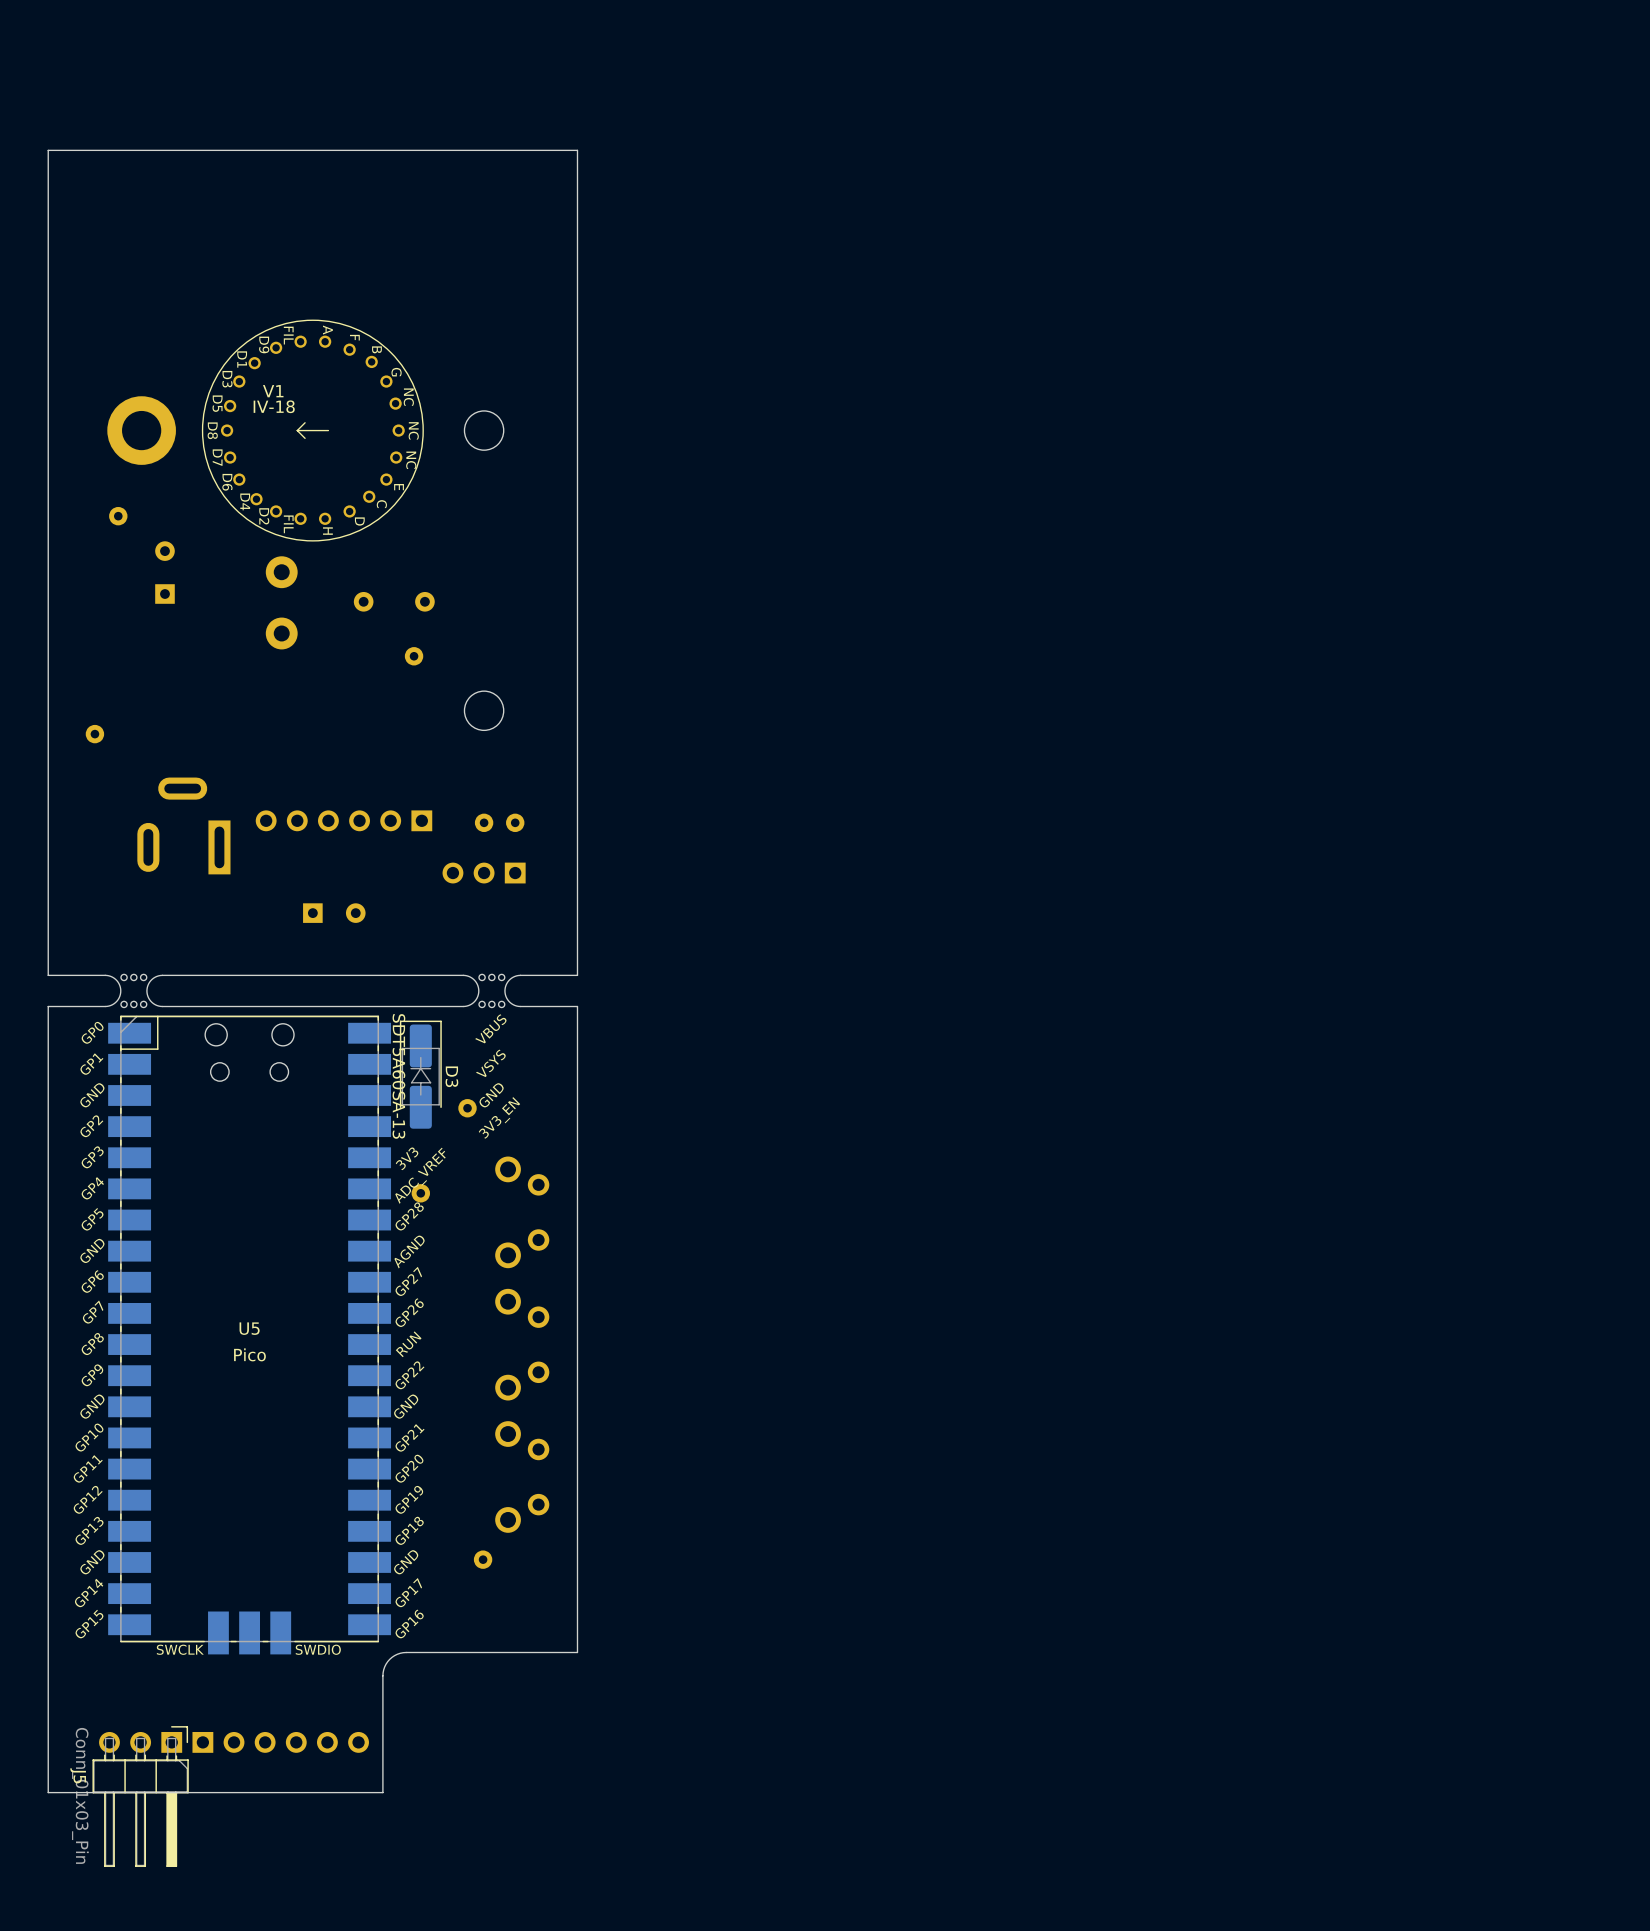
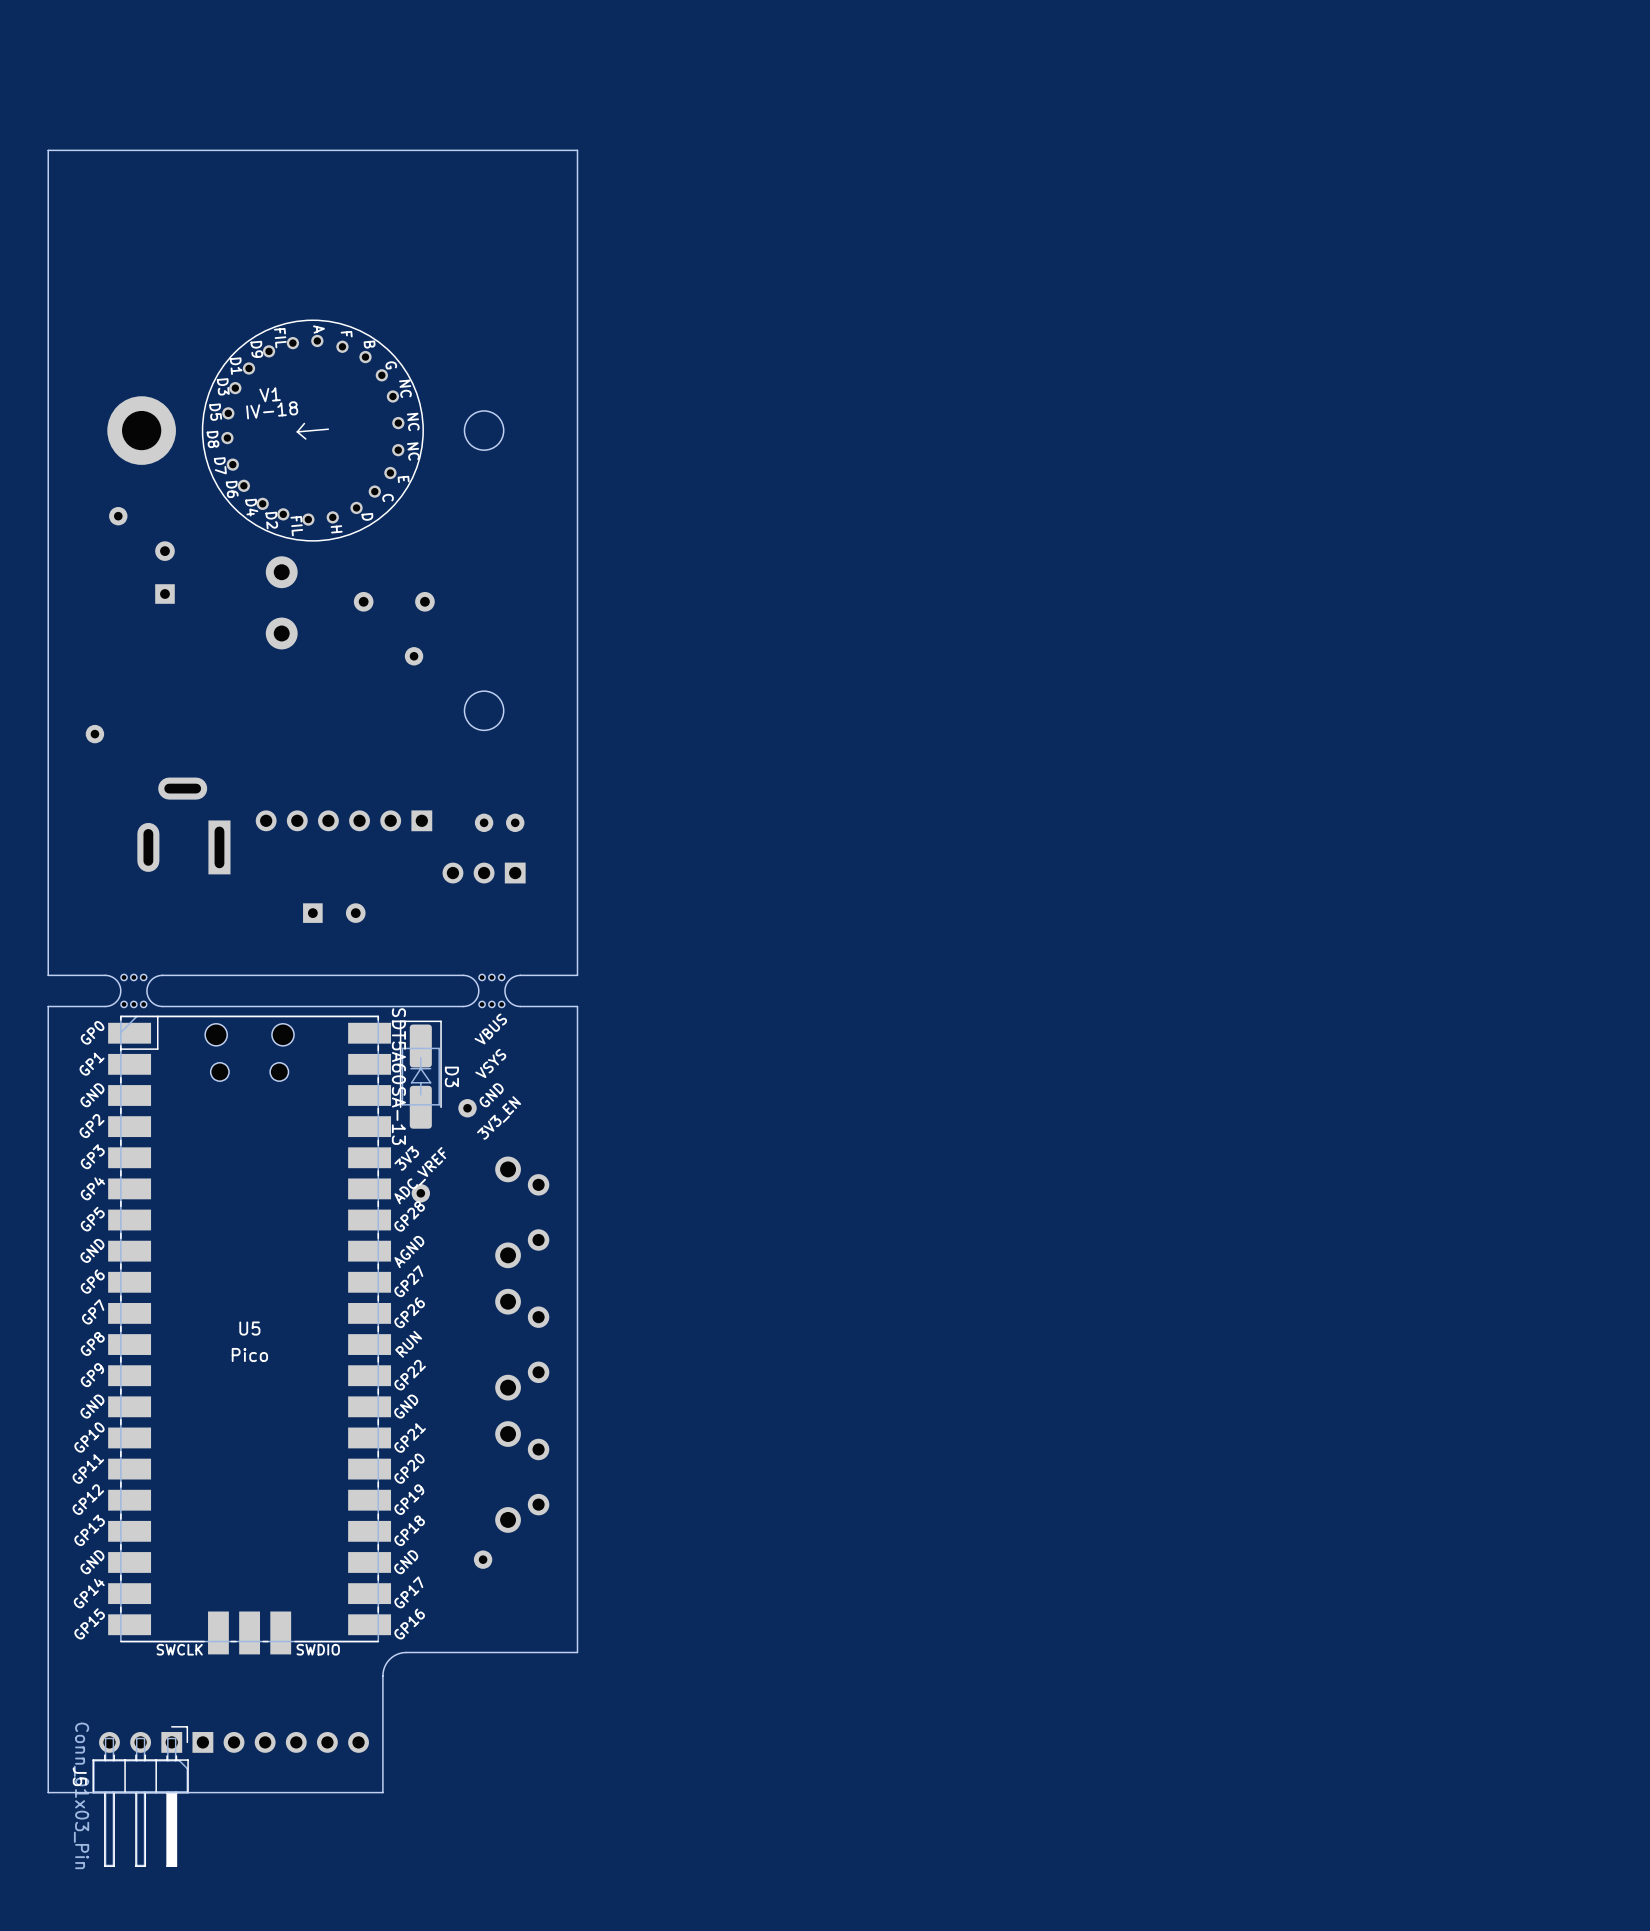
V1 rotation: 0° (312, 430) -> 5° counterclockwise (312, 430)

